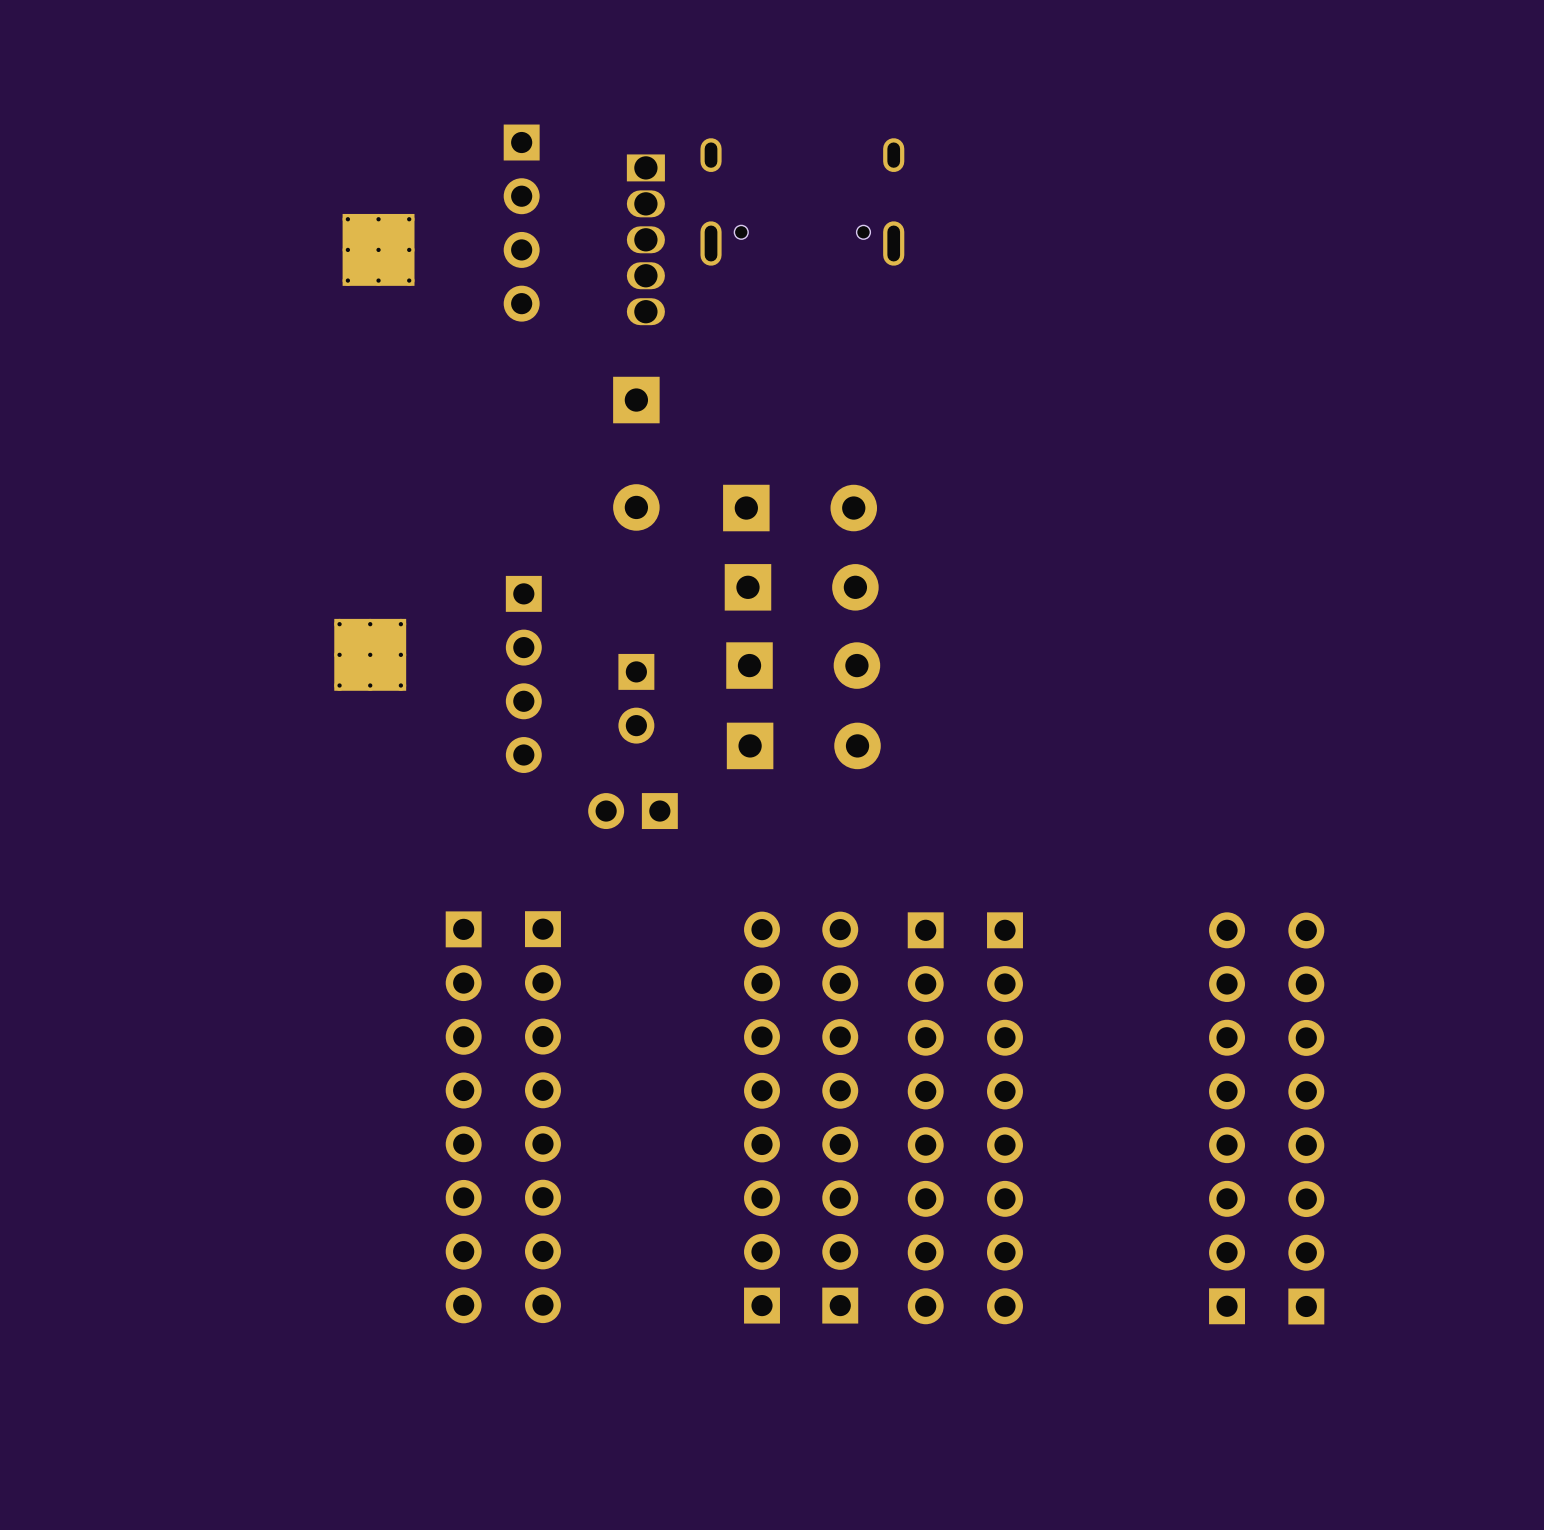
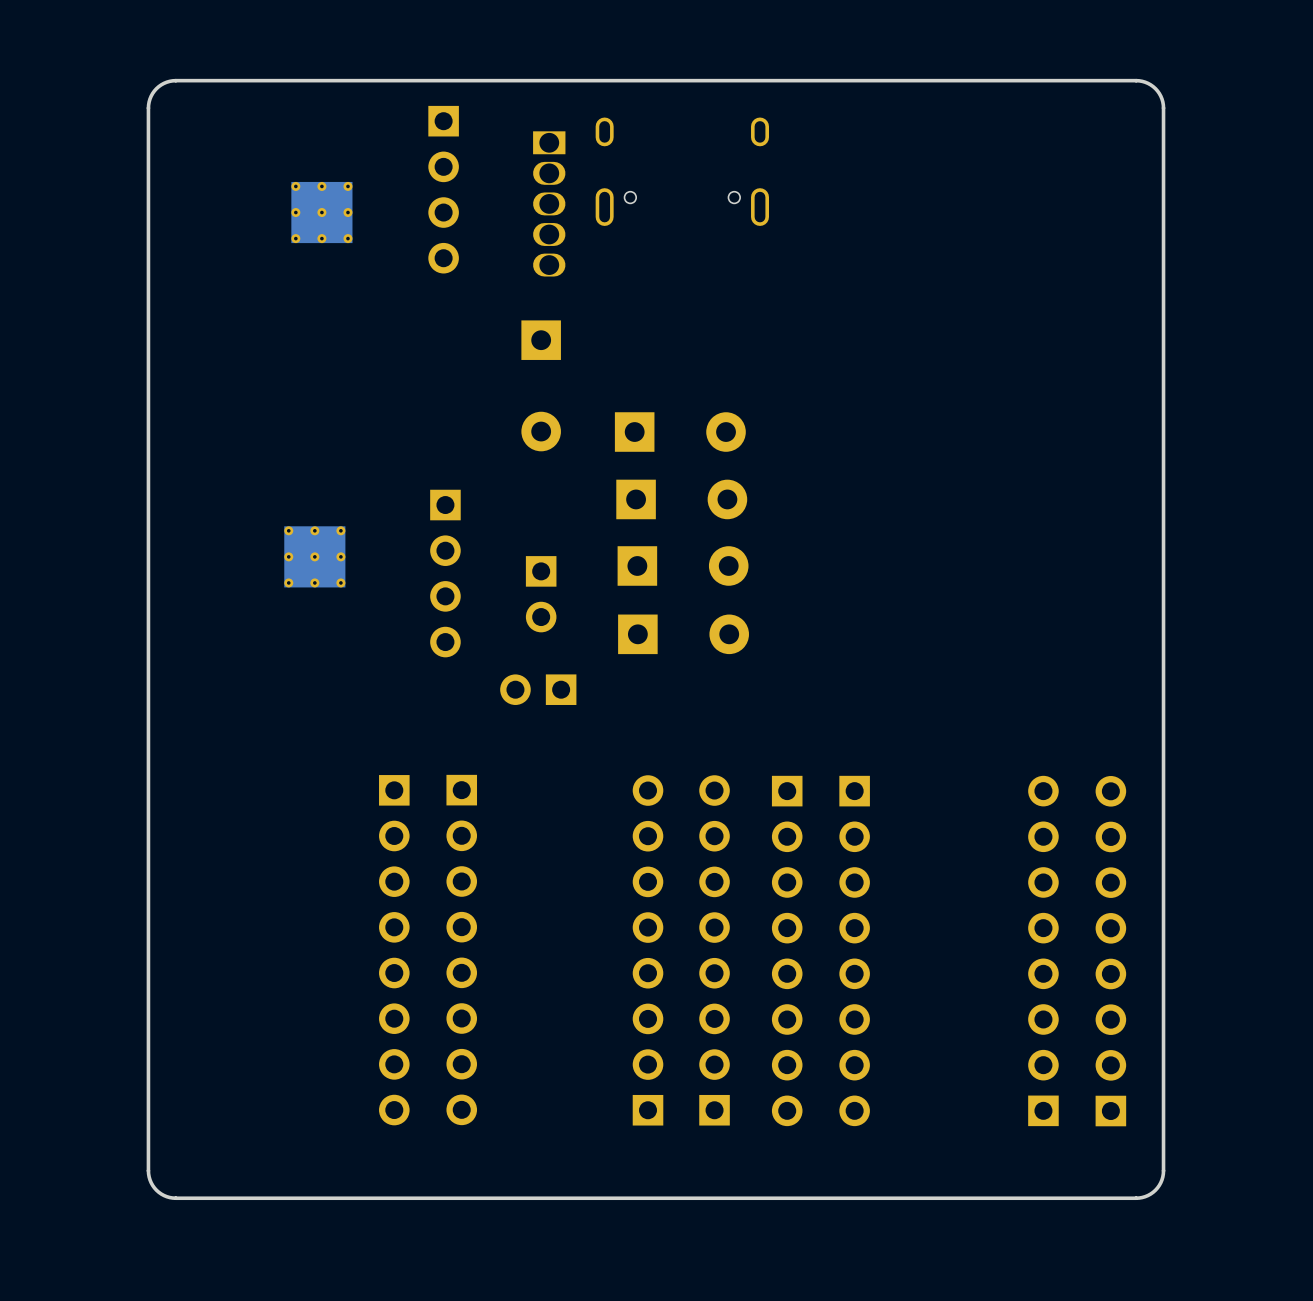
board edge: none -> (1136, 80) (175, 80) (163, 83) (154, 90) (149, 99) (148, 108) (148, 1170) (151, 1182) (158, 1192) (166, 1196) (175, 1198) (1136, 1198) (1148, 1195) (1157, 1187) (1161, 1179) (1163, 1170) (1163, 108) (1160, 96) (1155, 88) (1148, 83) (1136, 80)

